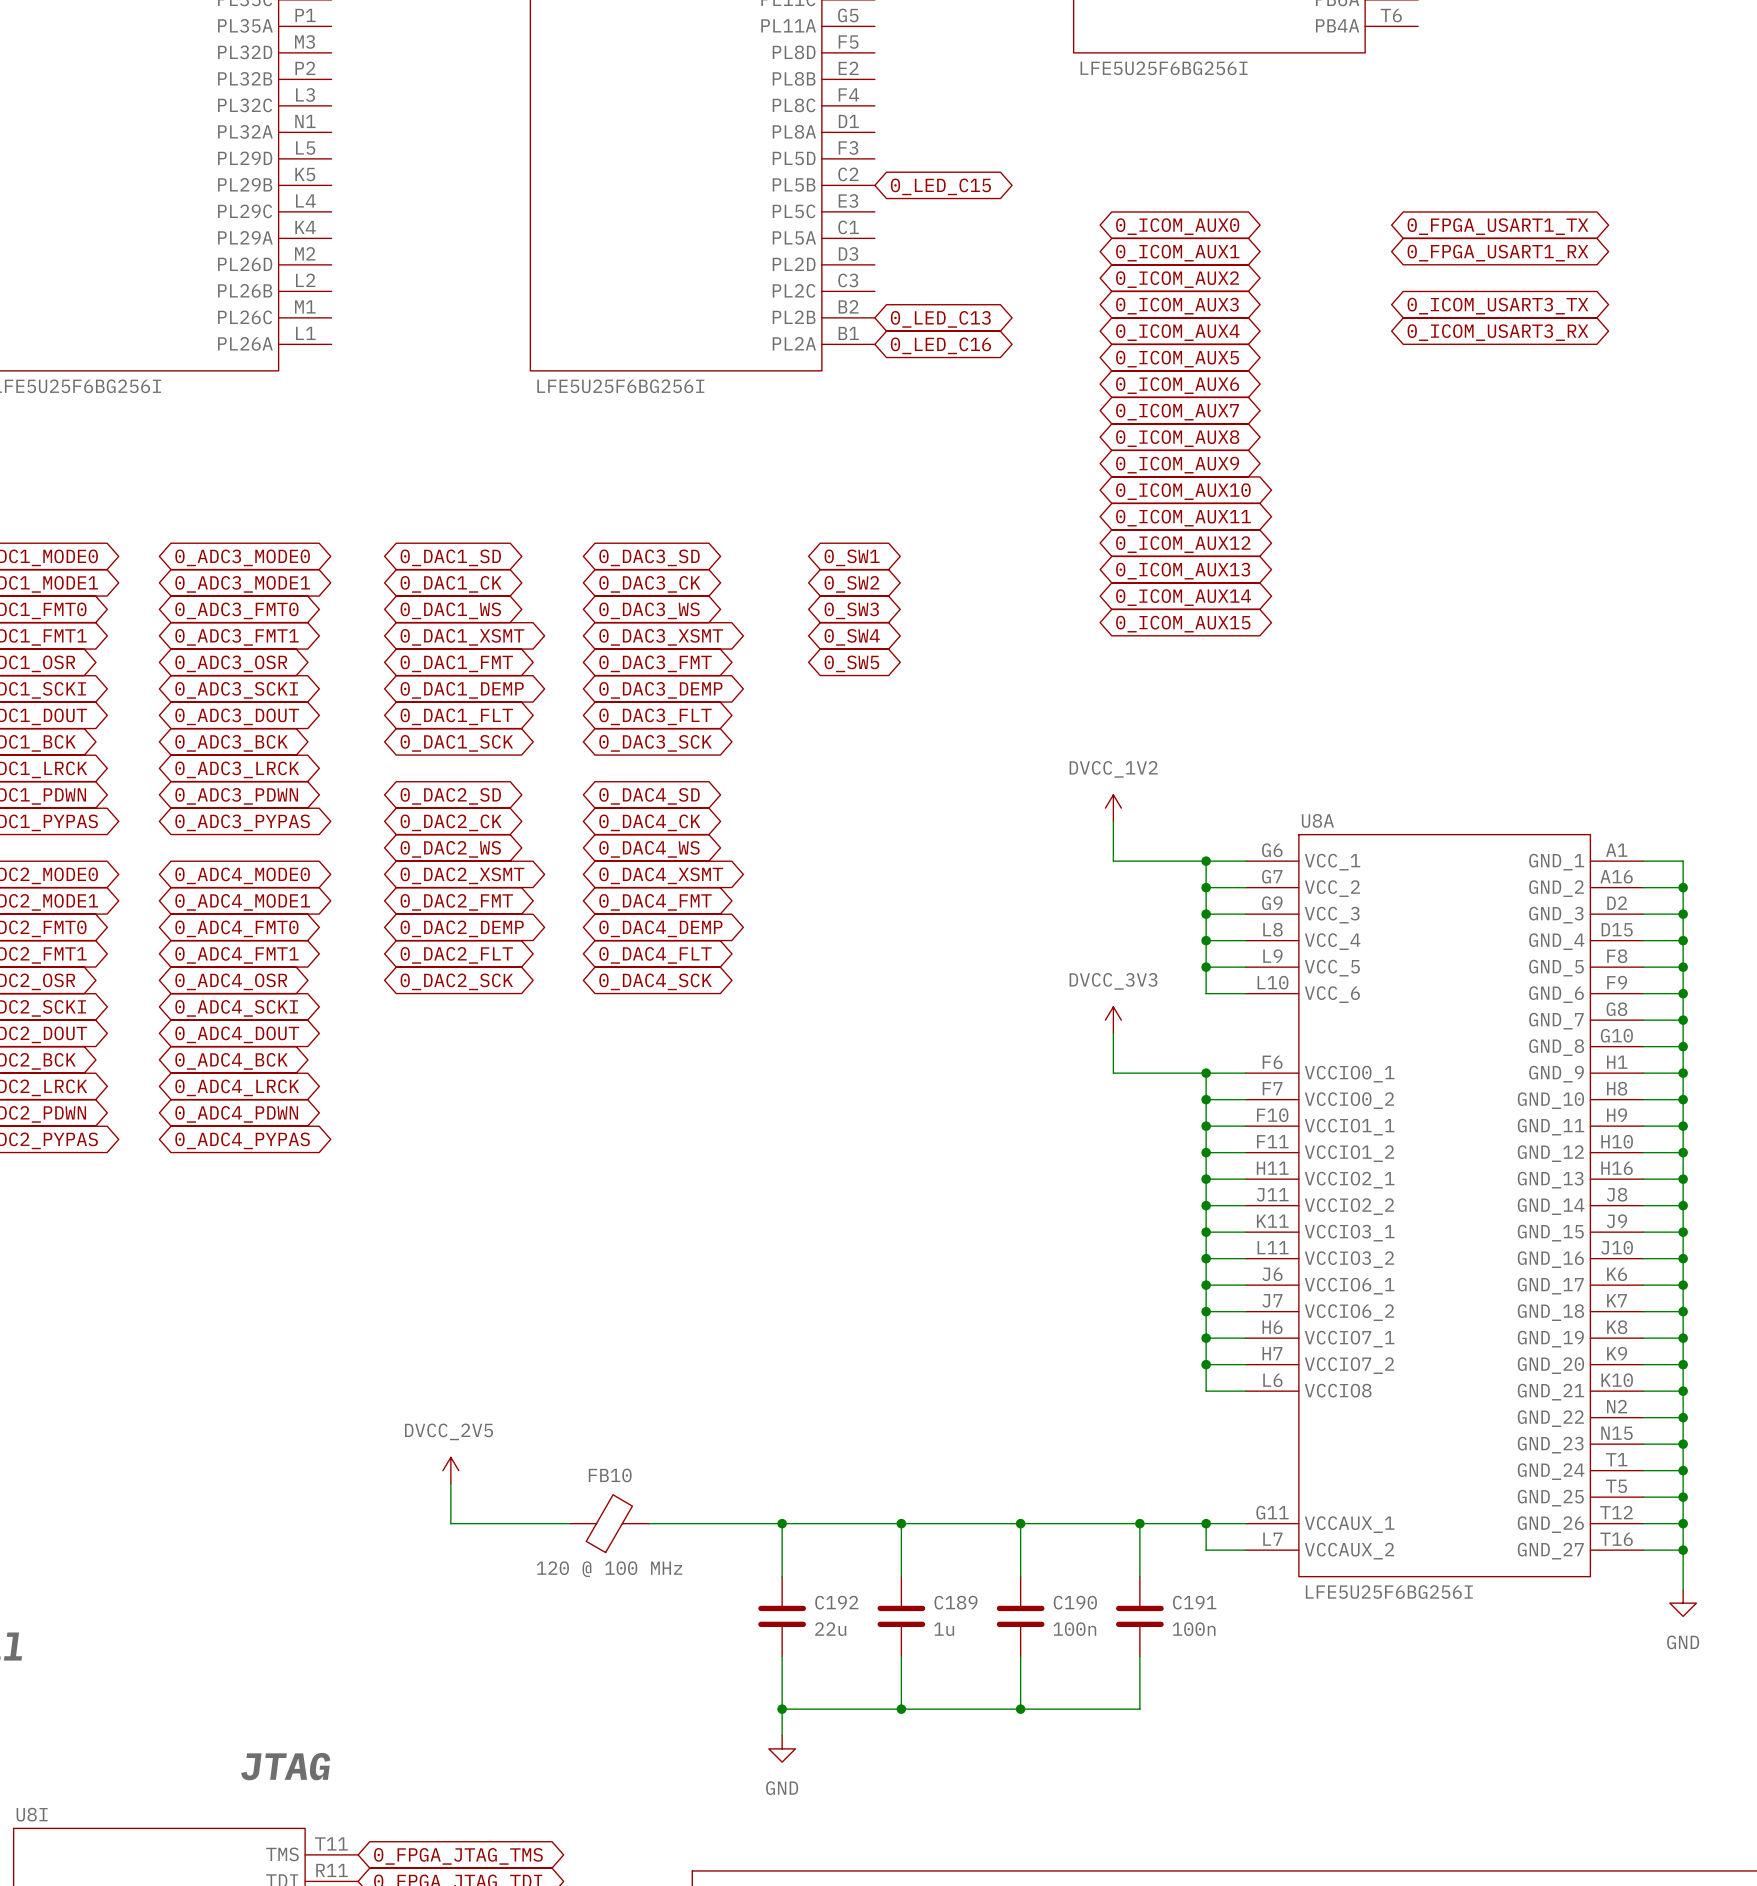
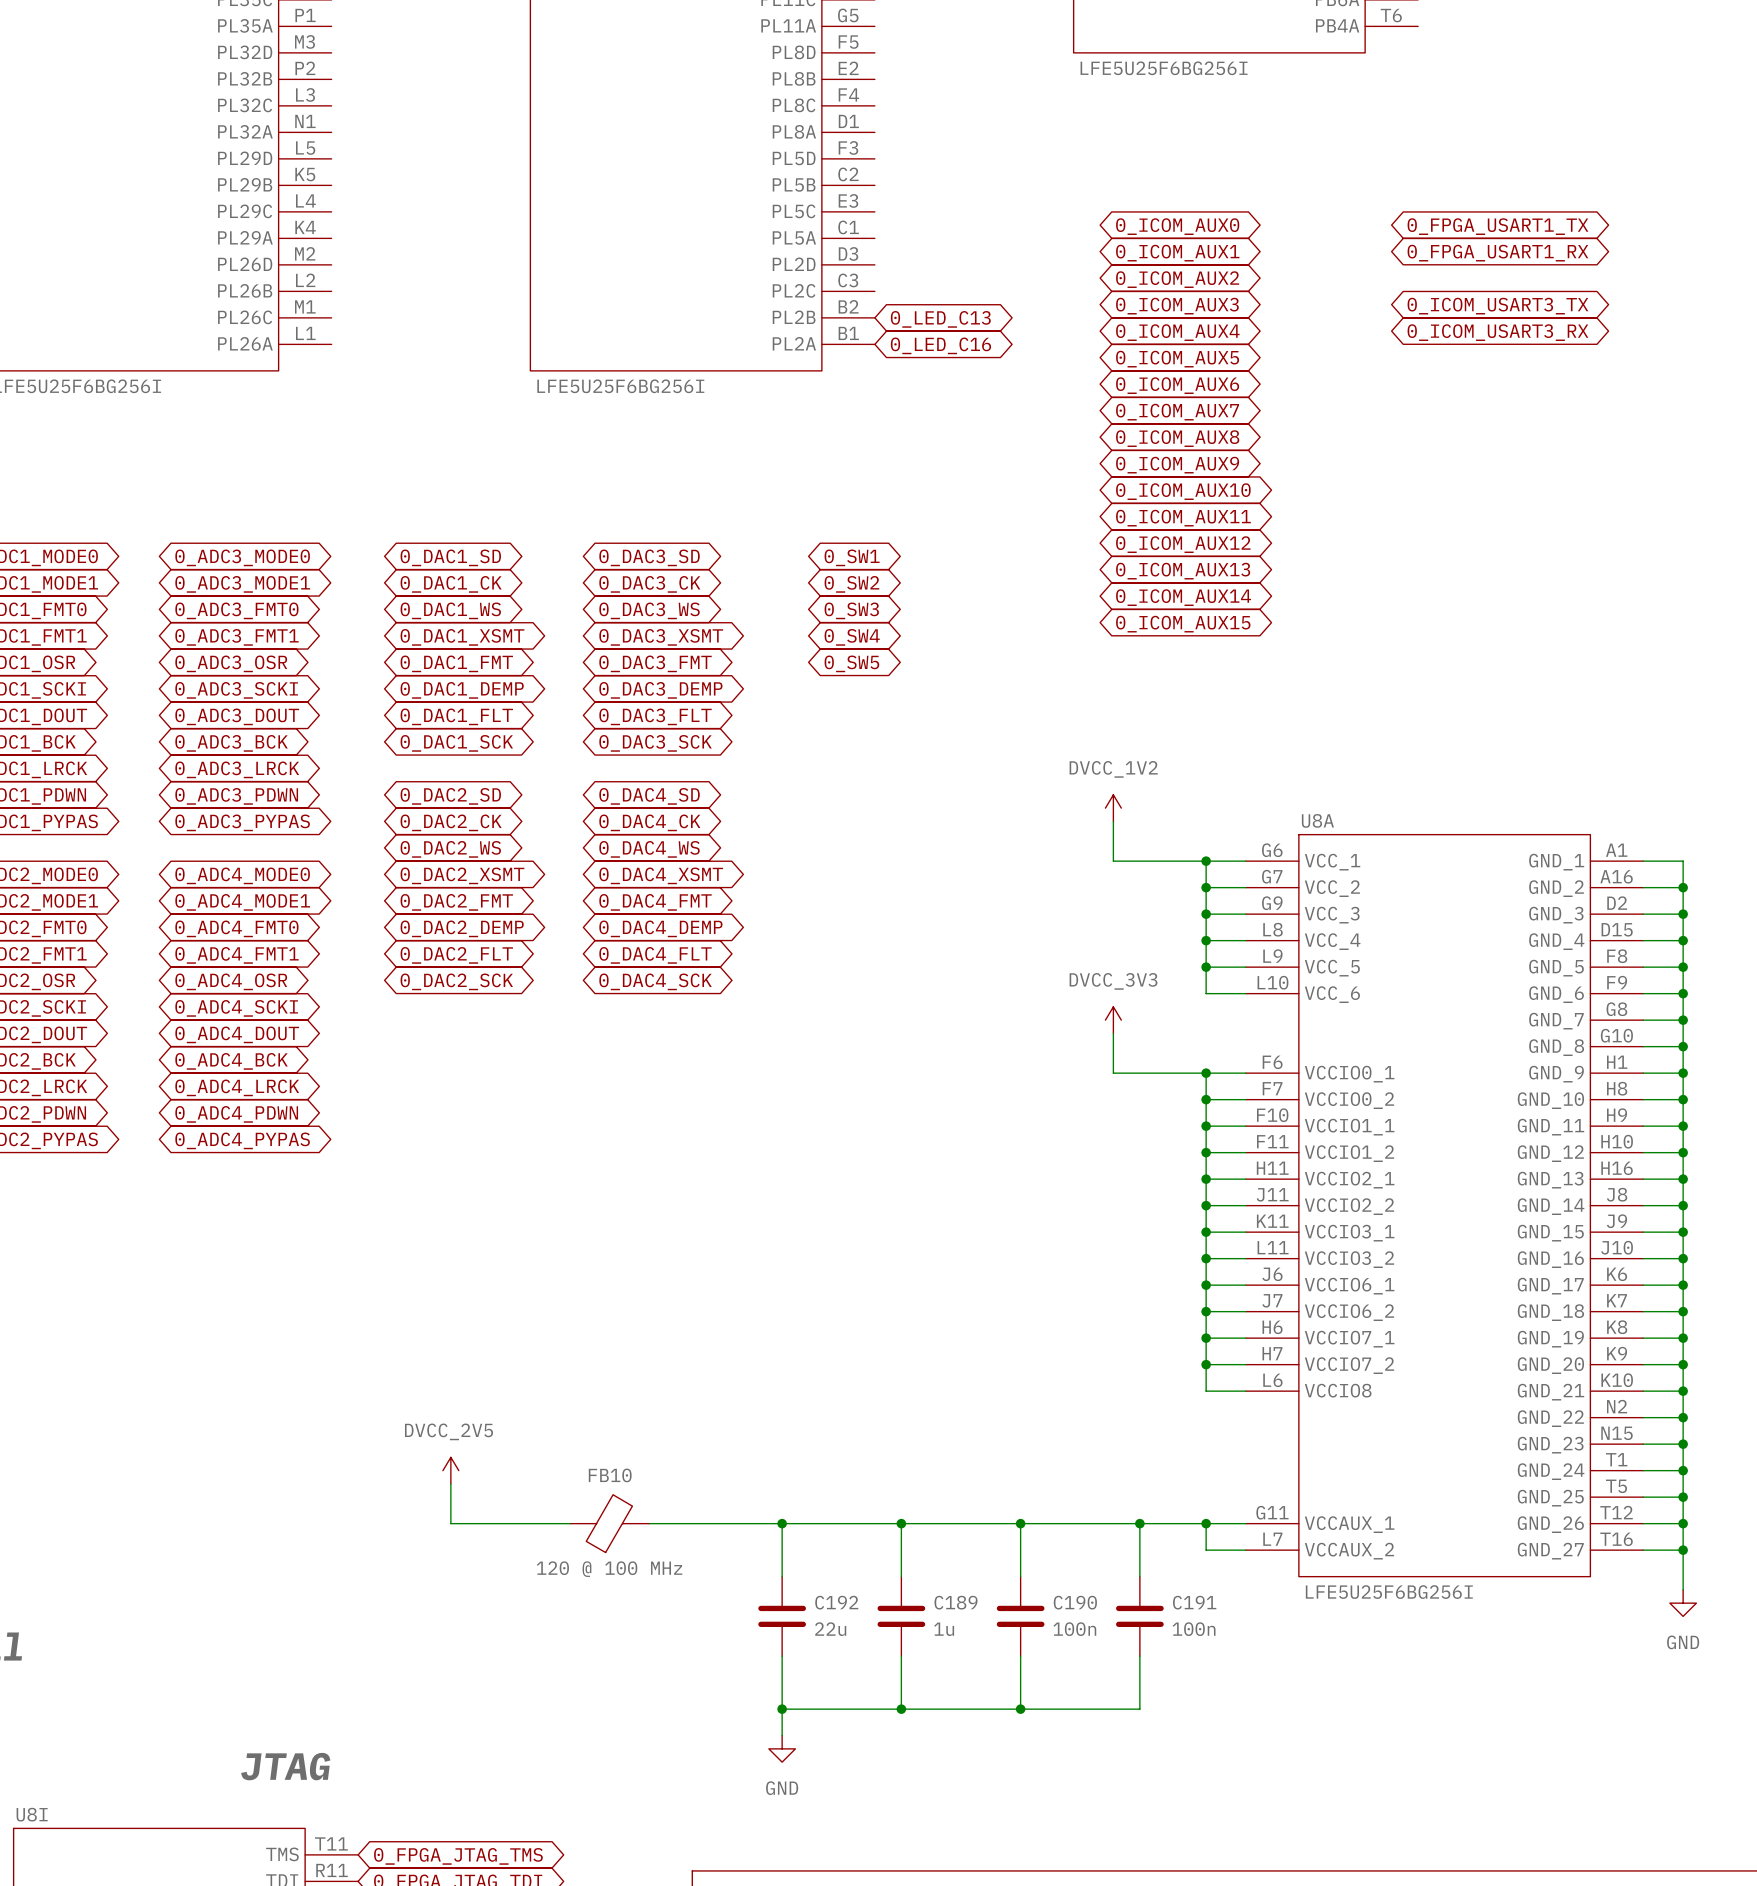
global label: 0_LED_C15 (940, 186) -> none

